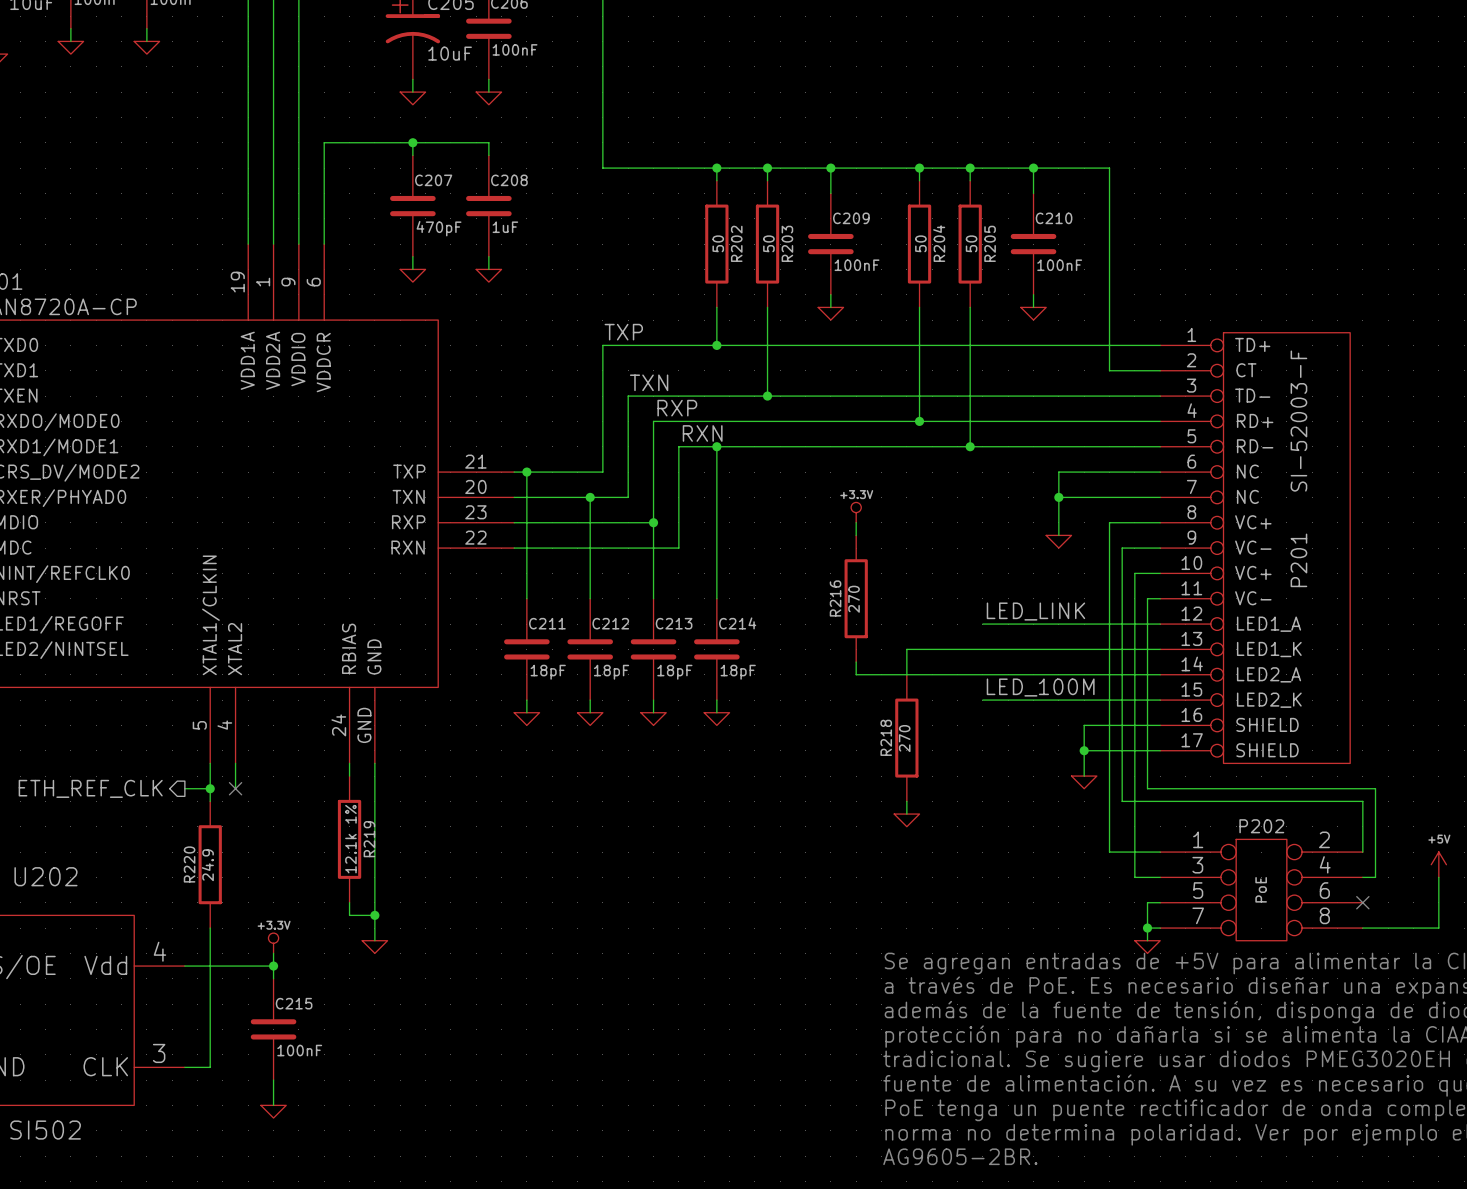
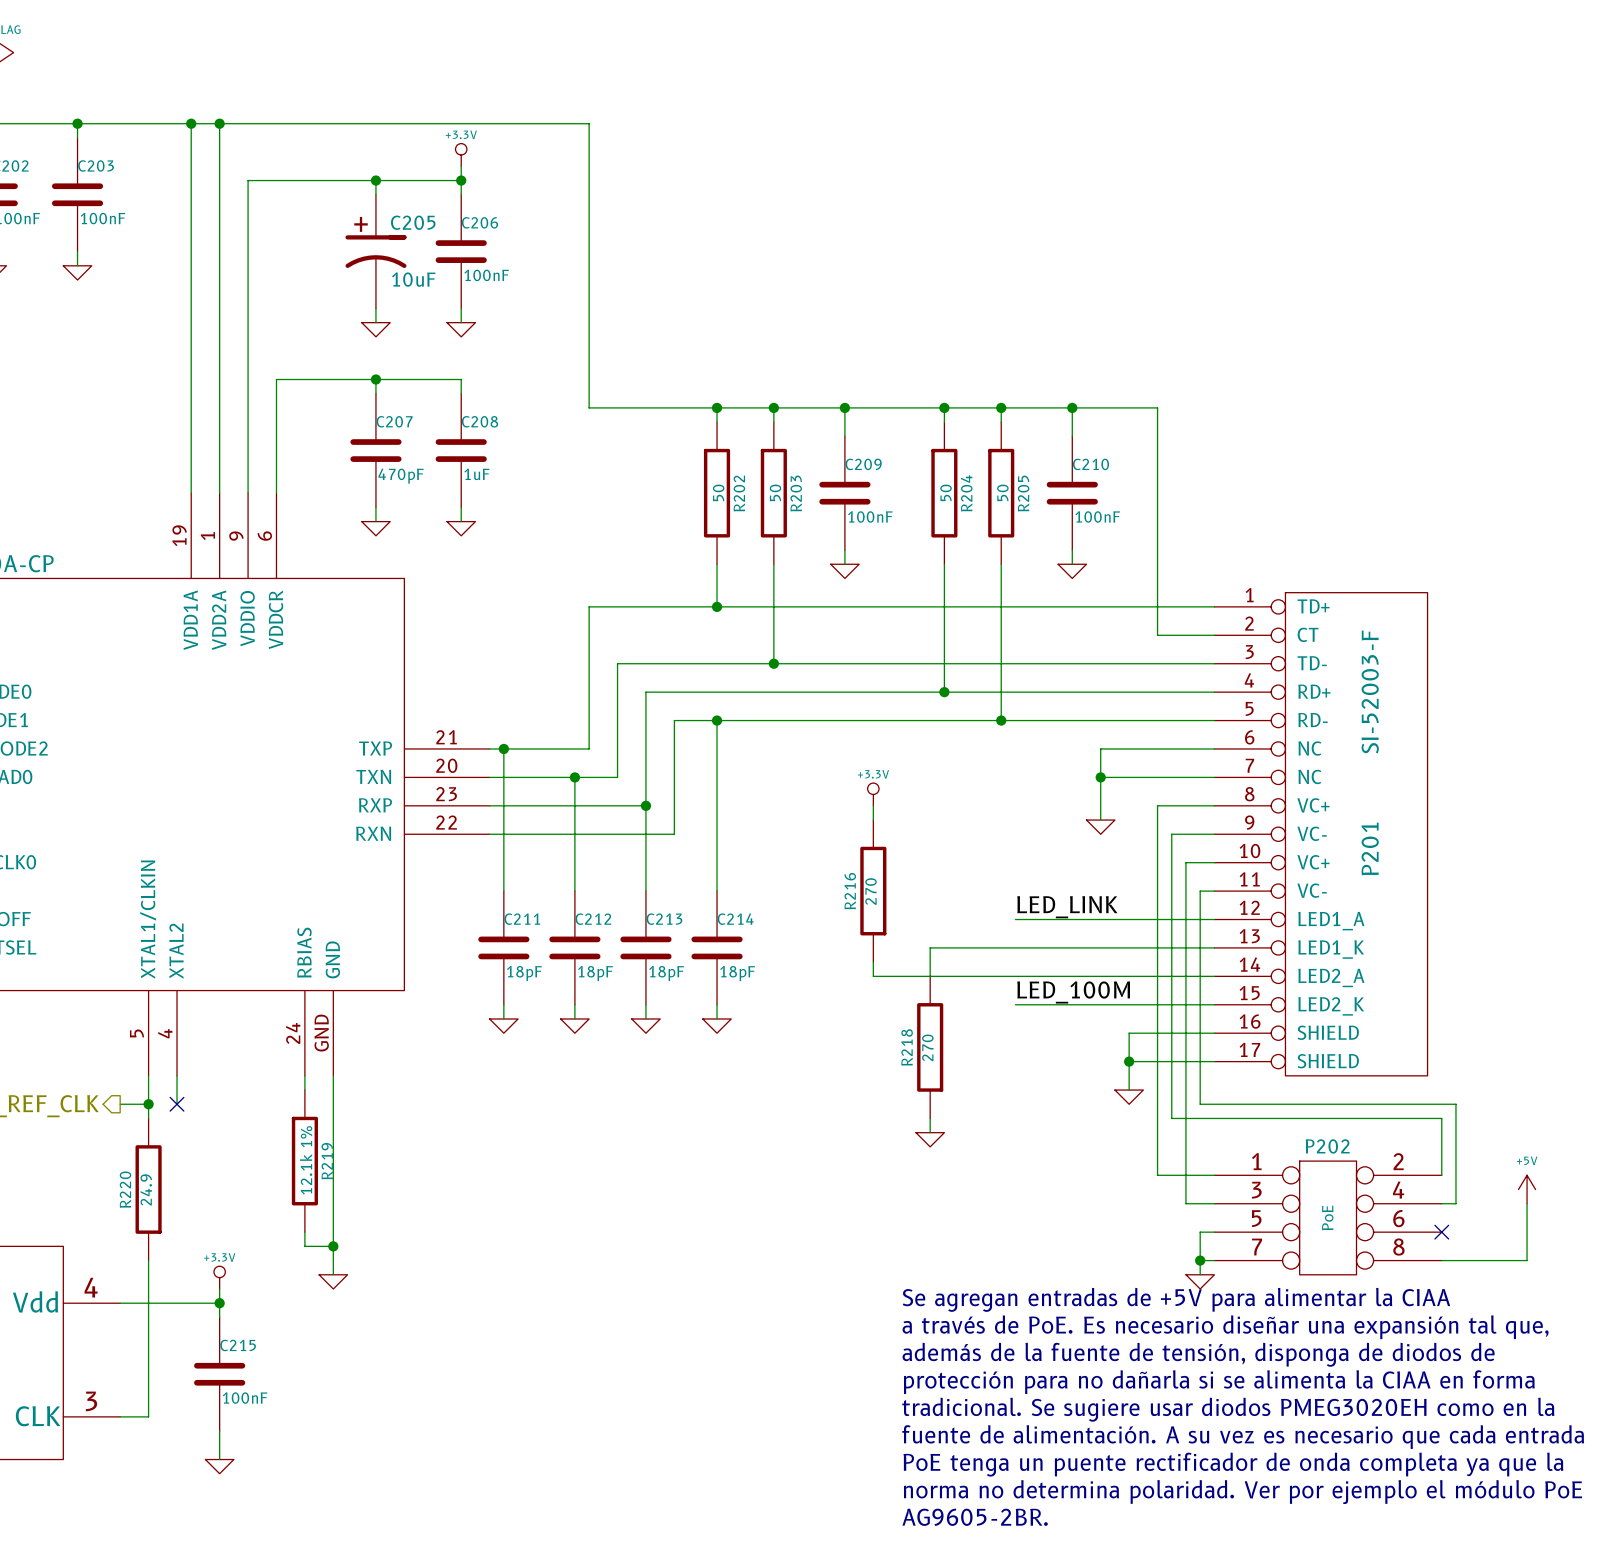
label: TXP (623, 332) -> none
label: TXN (649, 382) -> none
label: RXP (677, 408) -> none
label: RXN (702, 433) -> none

